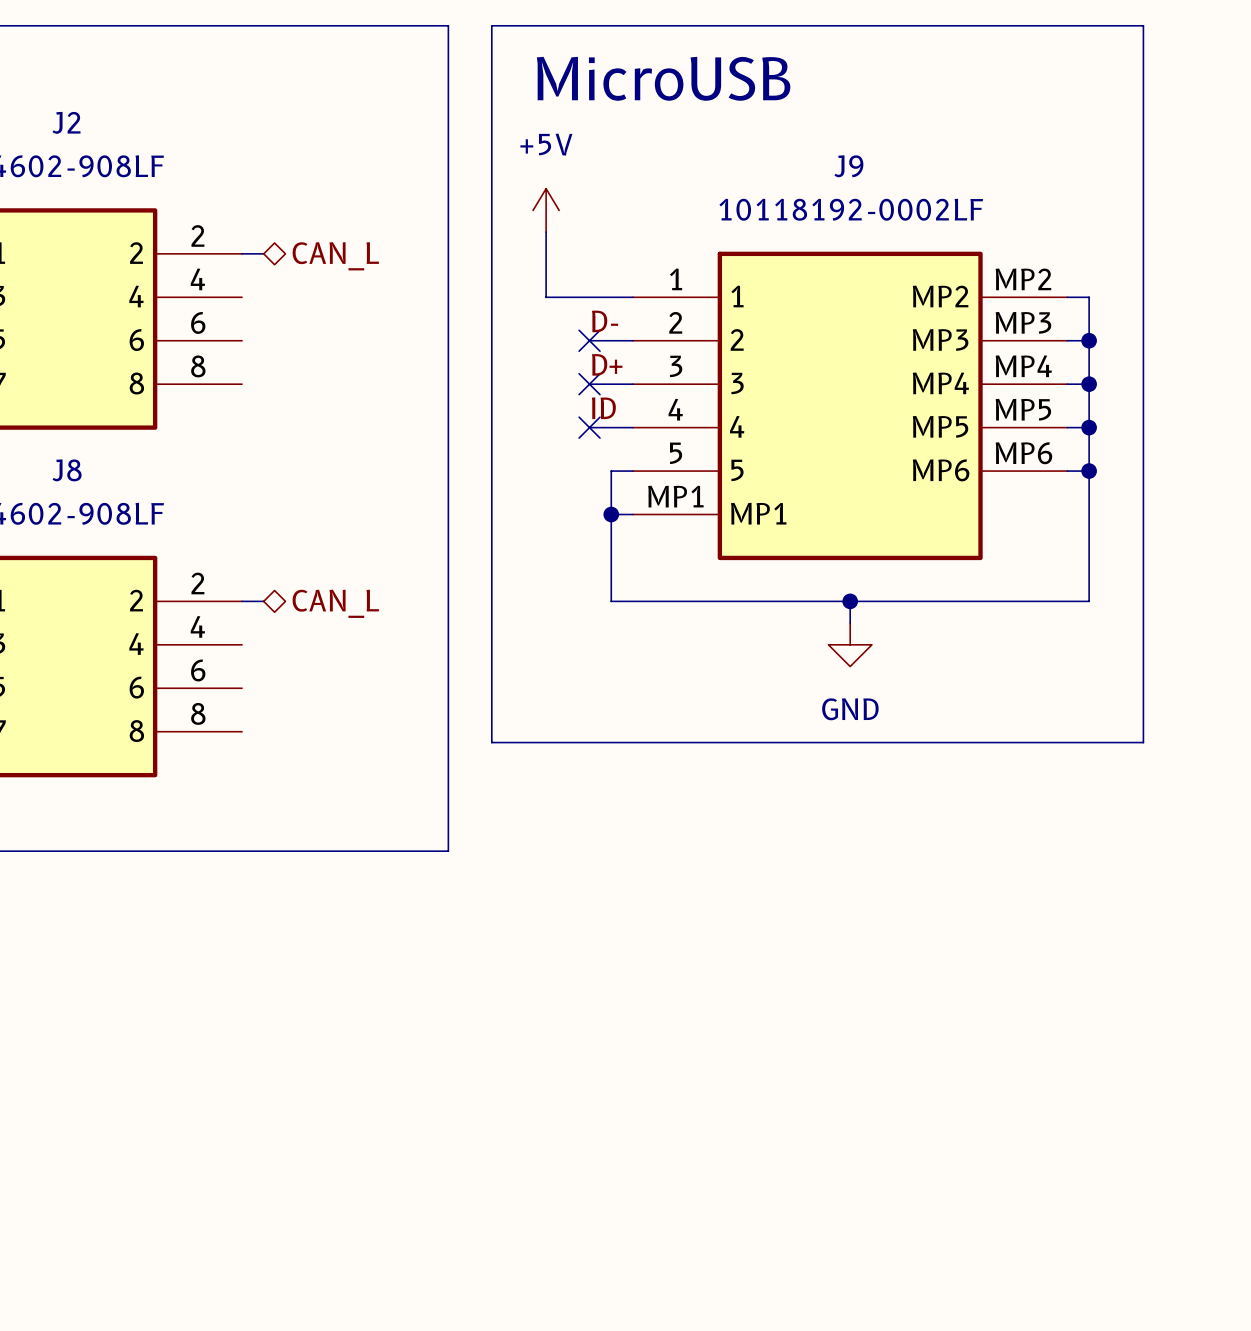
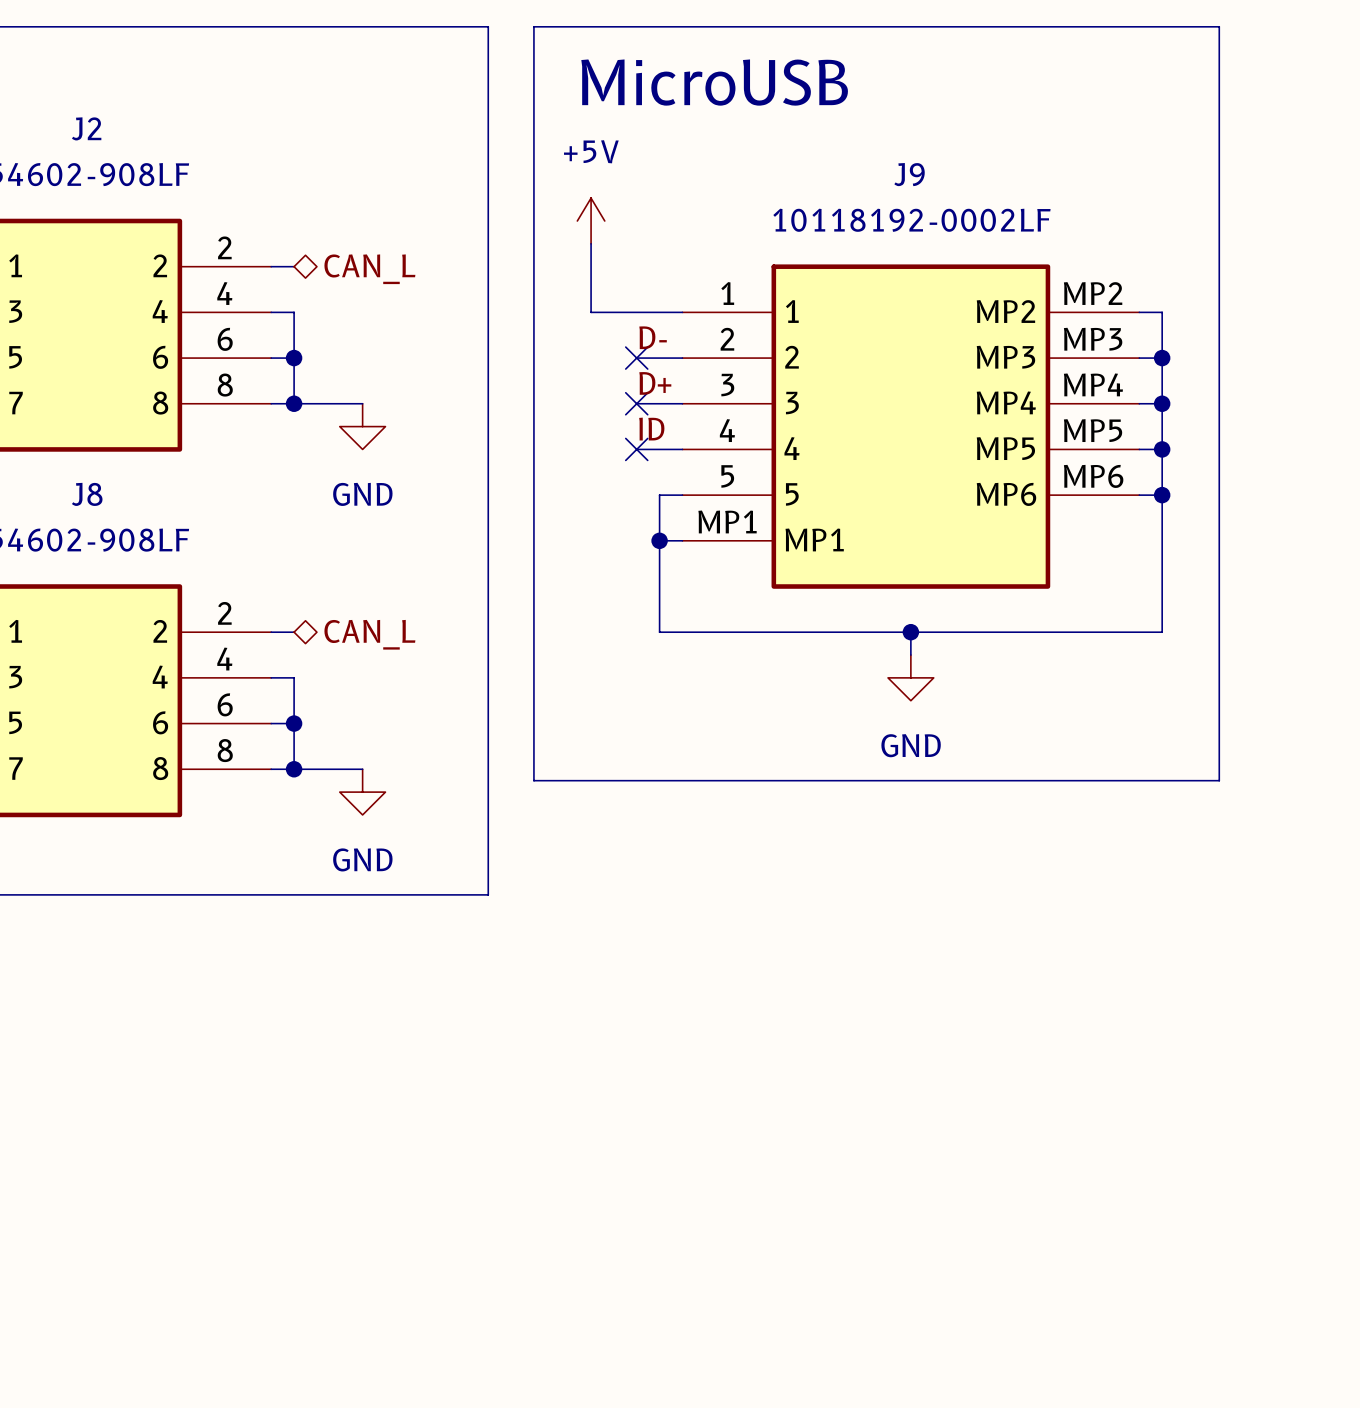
wire: none -> (271, 312) (294, 312) (294, 403)
wire: none -> (271, 358) (294, 358)
junction: none -> (294, 358)
wire: none -> (271, 403) (362, 403)
junction: none -> (294, 403)
power symbol: none -> GND (362, 426)
wire: none -> (271, 677) (294, 677) (294, 769)
wire: none -> (271, 723) (294, 723)
junction: none -> (294, 723)
wire: none -> (271, 769) (362, 769)
junction: none -> (294, 769)
power symbol: none -> GND (362, 792)

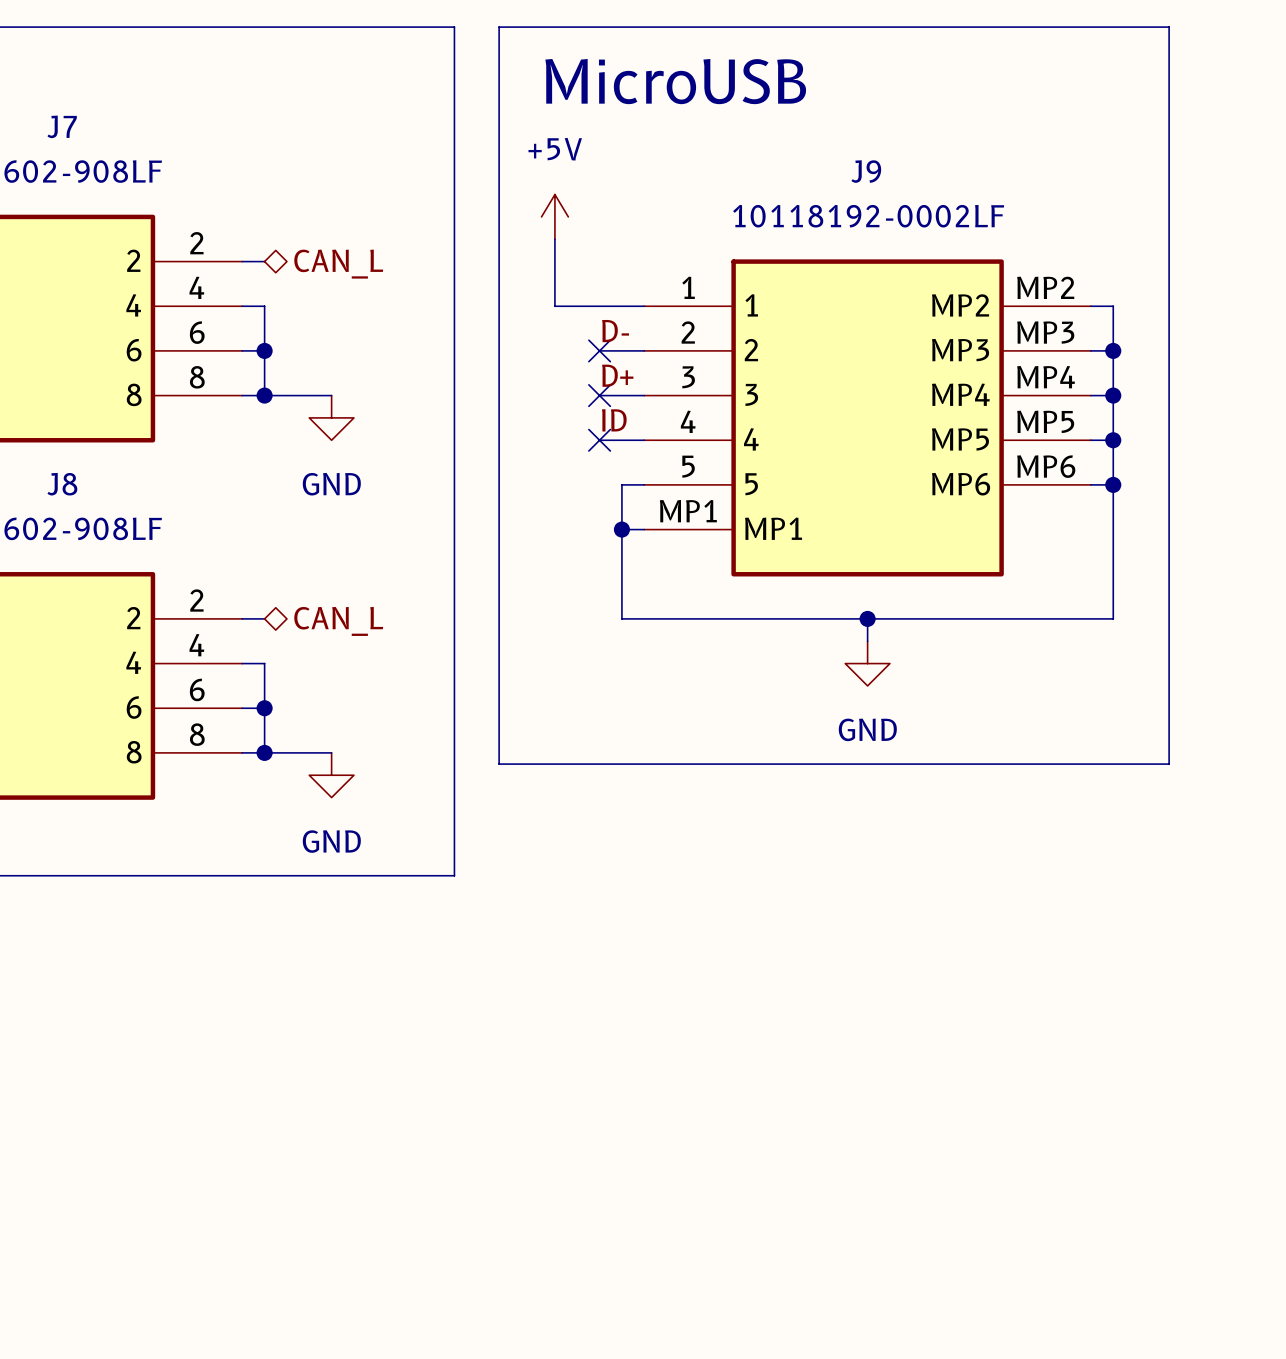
J2 name: J2 (86, 128) -> J7 (62, 126)

